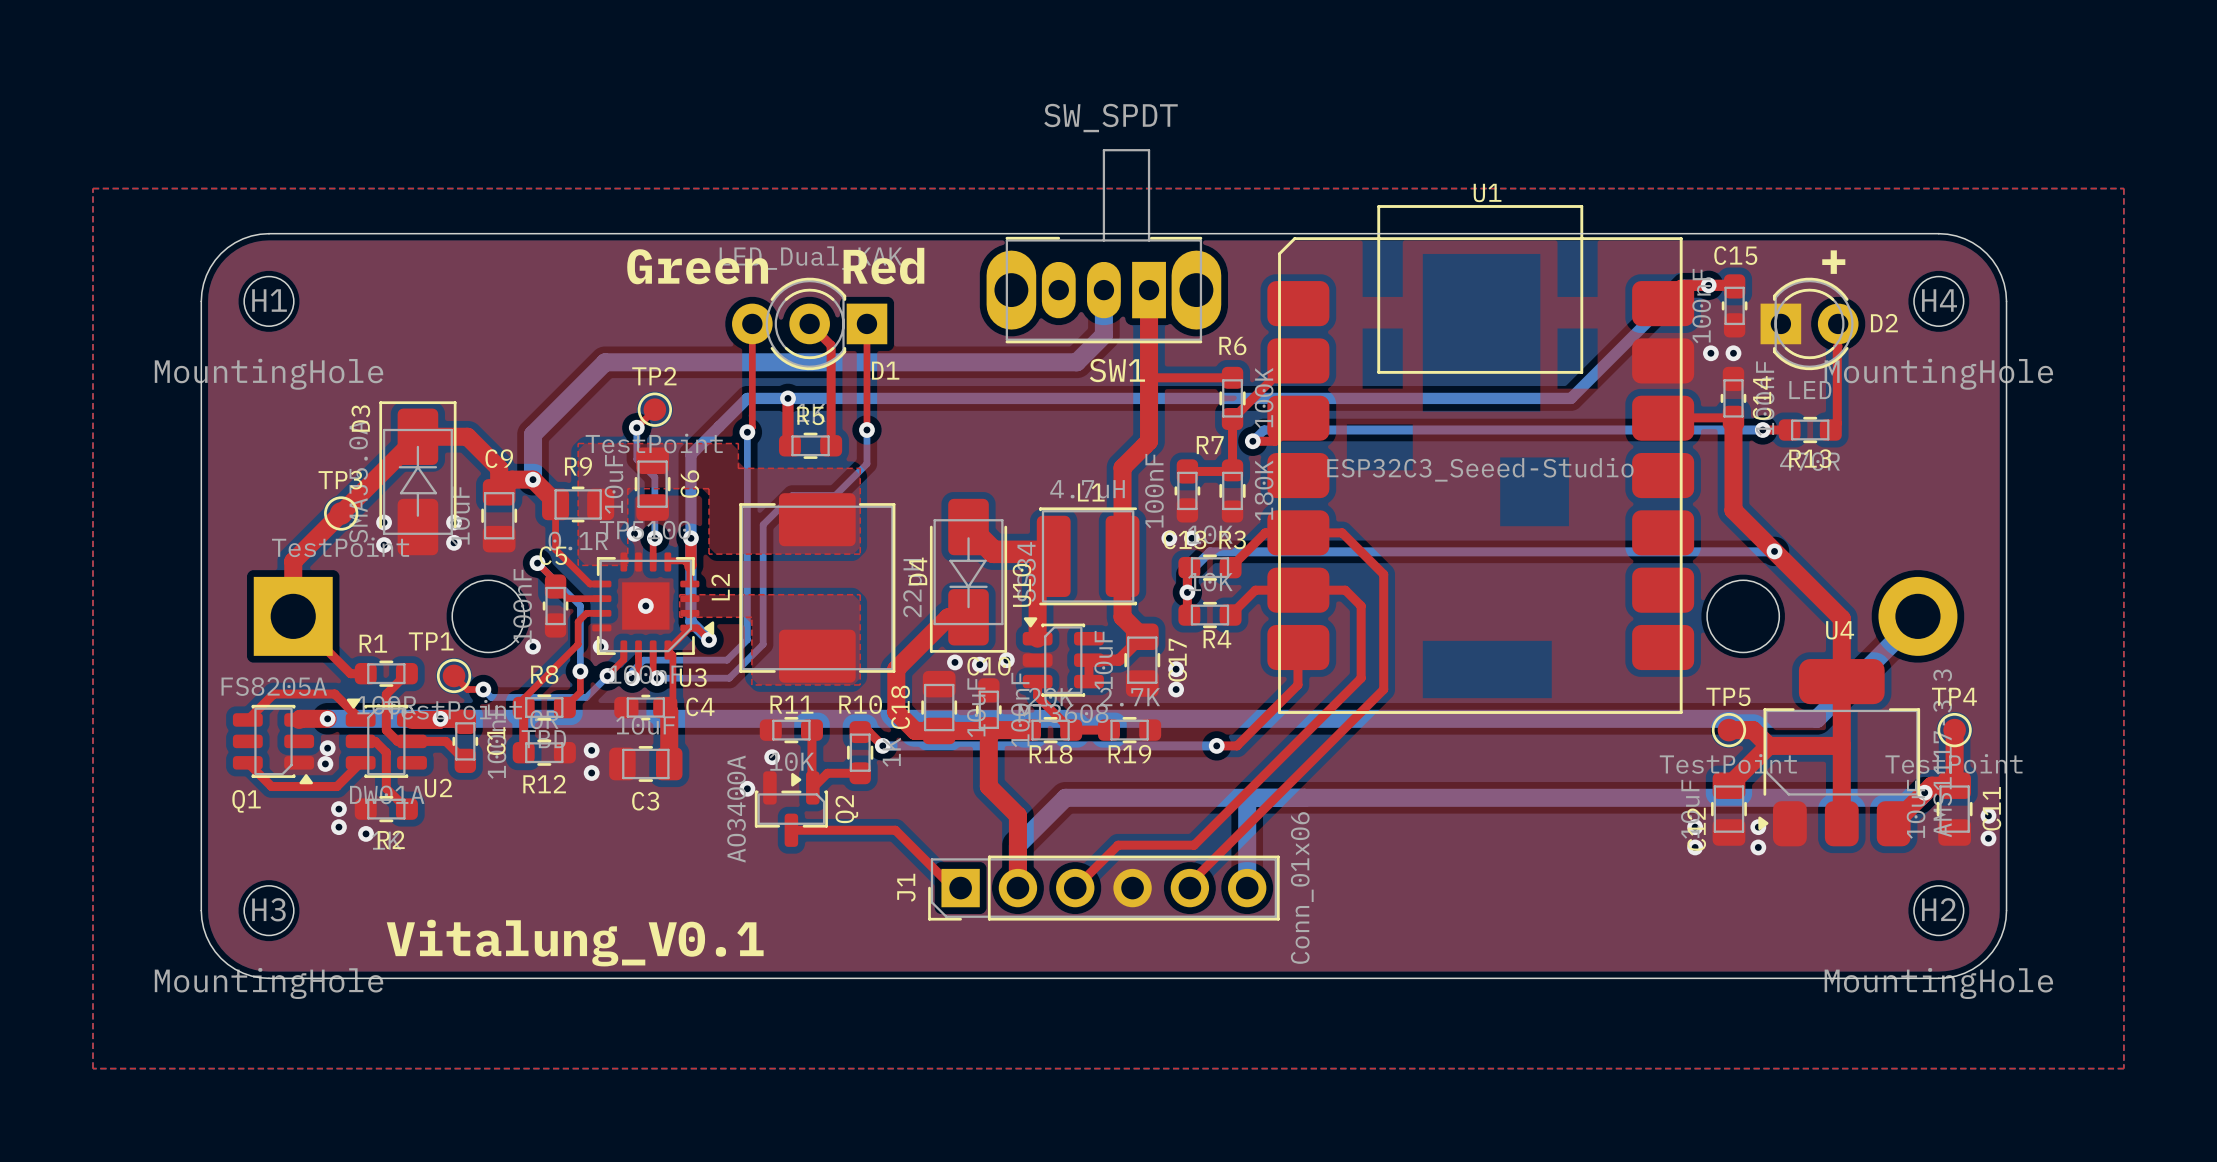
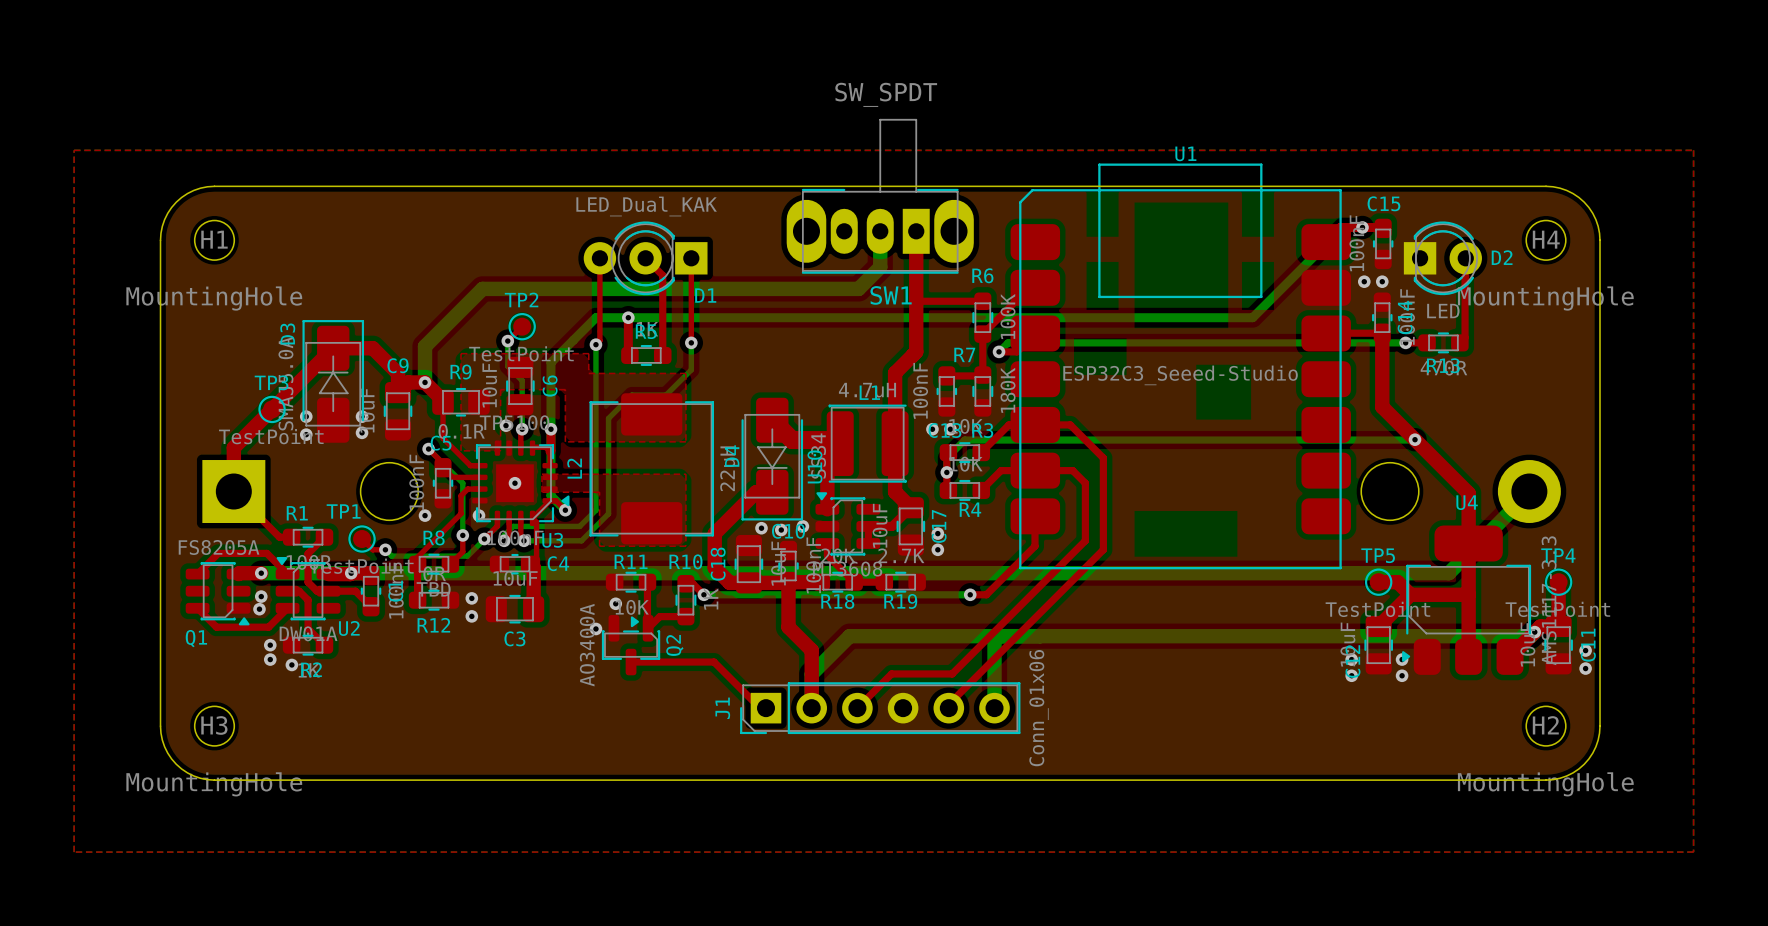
text: + (1833, 262) -> none
text: Green (697, 266) -> none
text: Red (883, 266) -> none
text: Vitalung_V0.1 (575, 943) -> none

